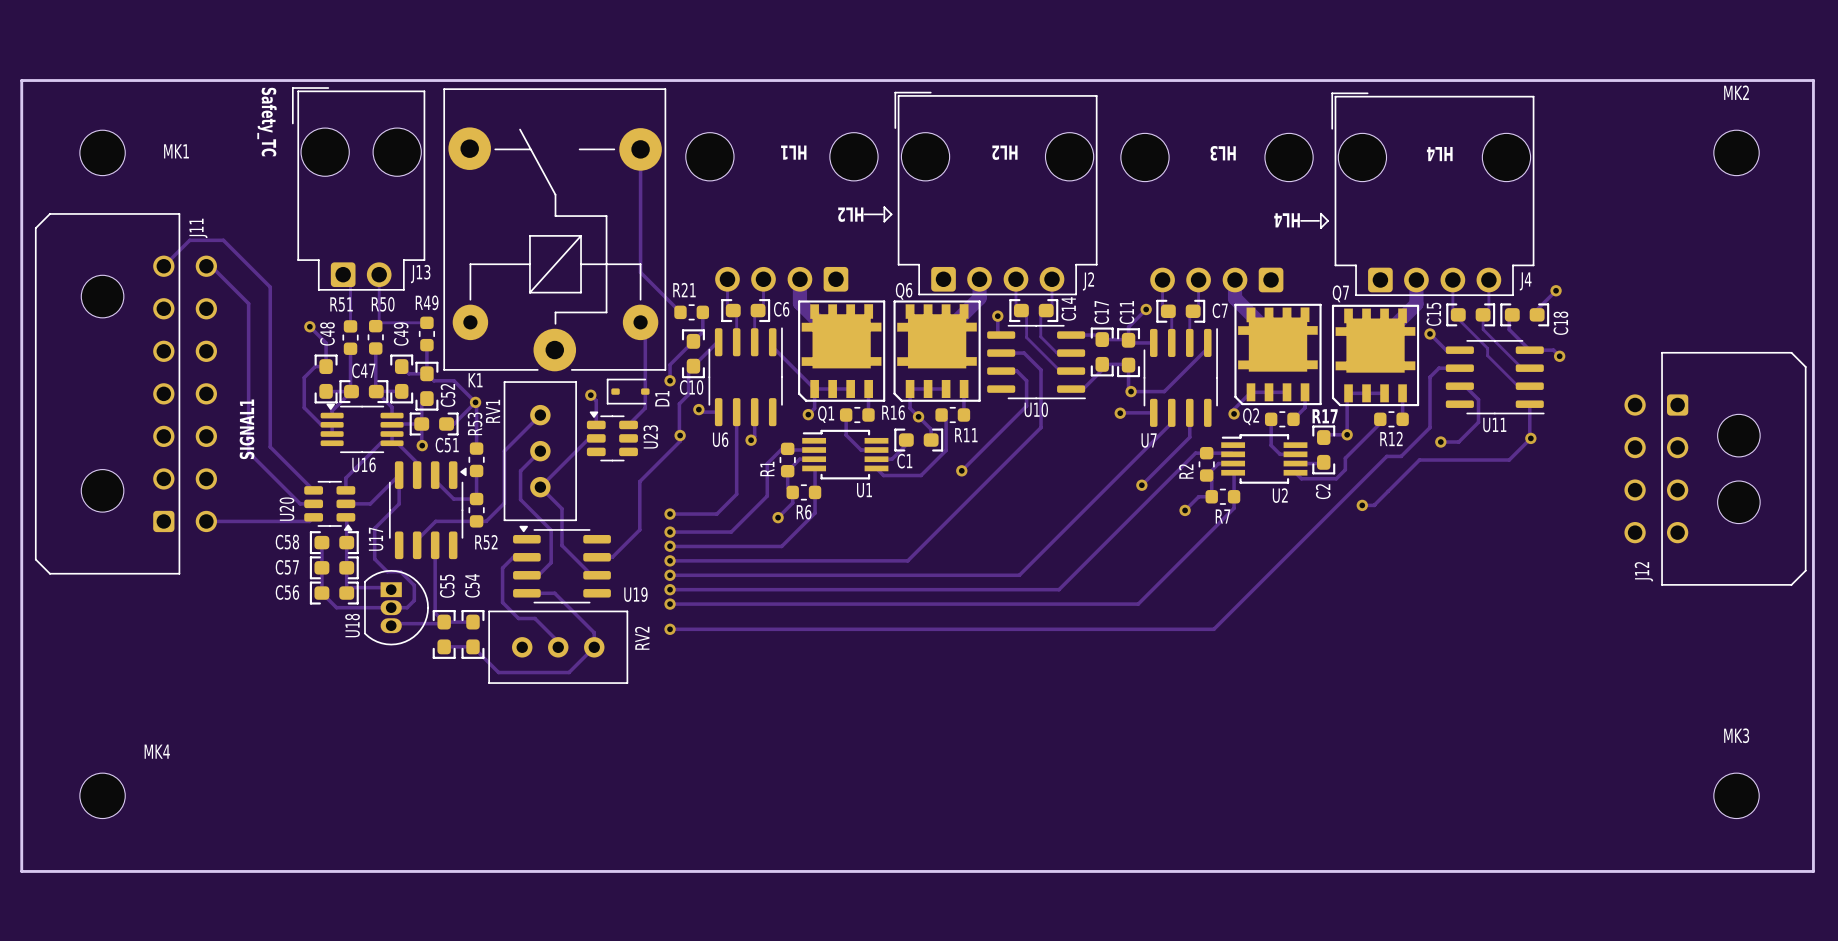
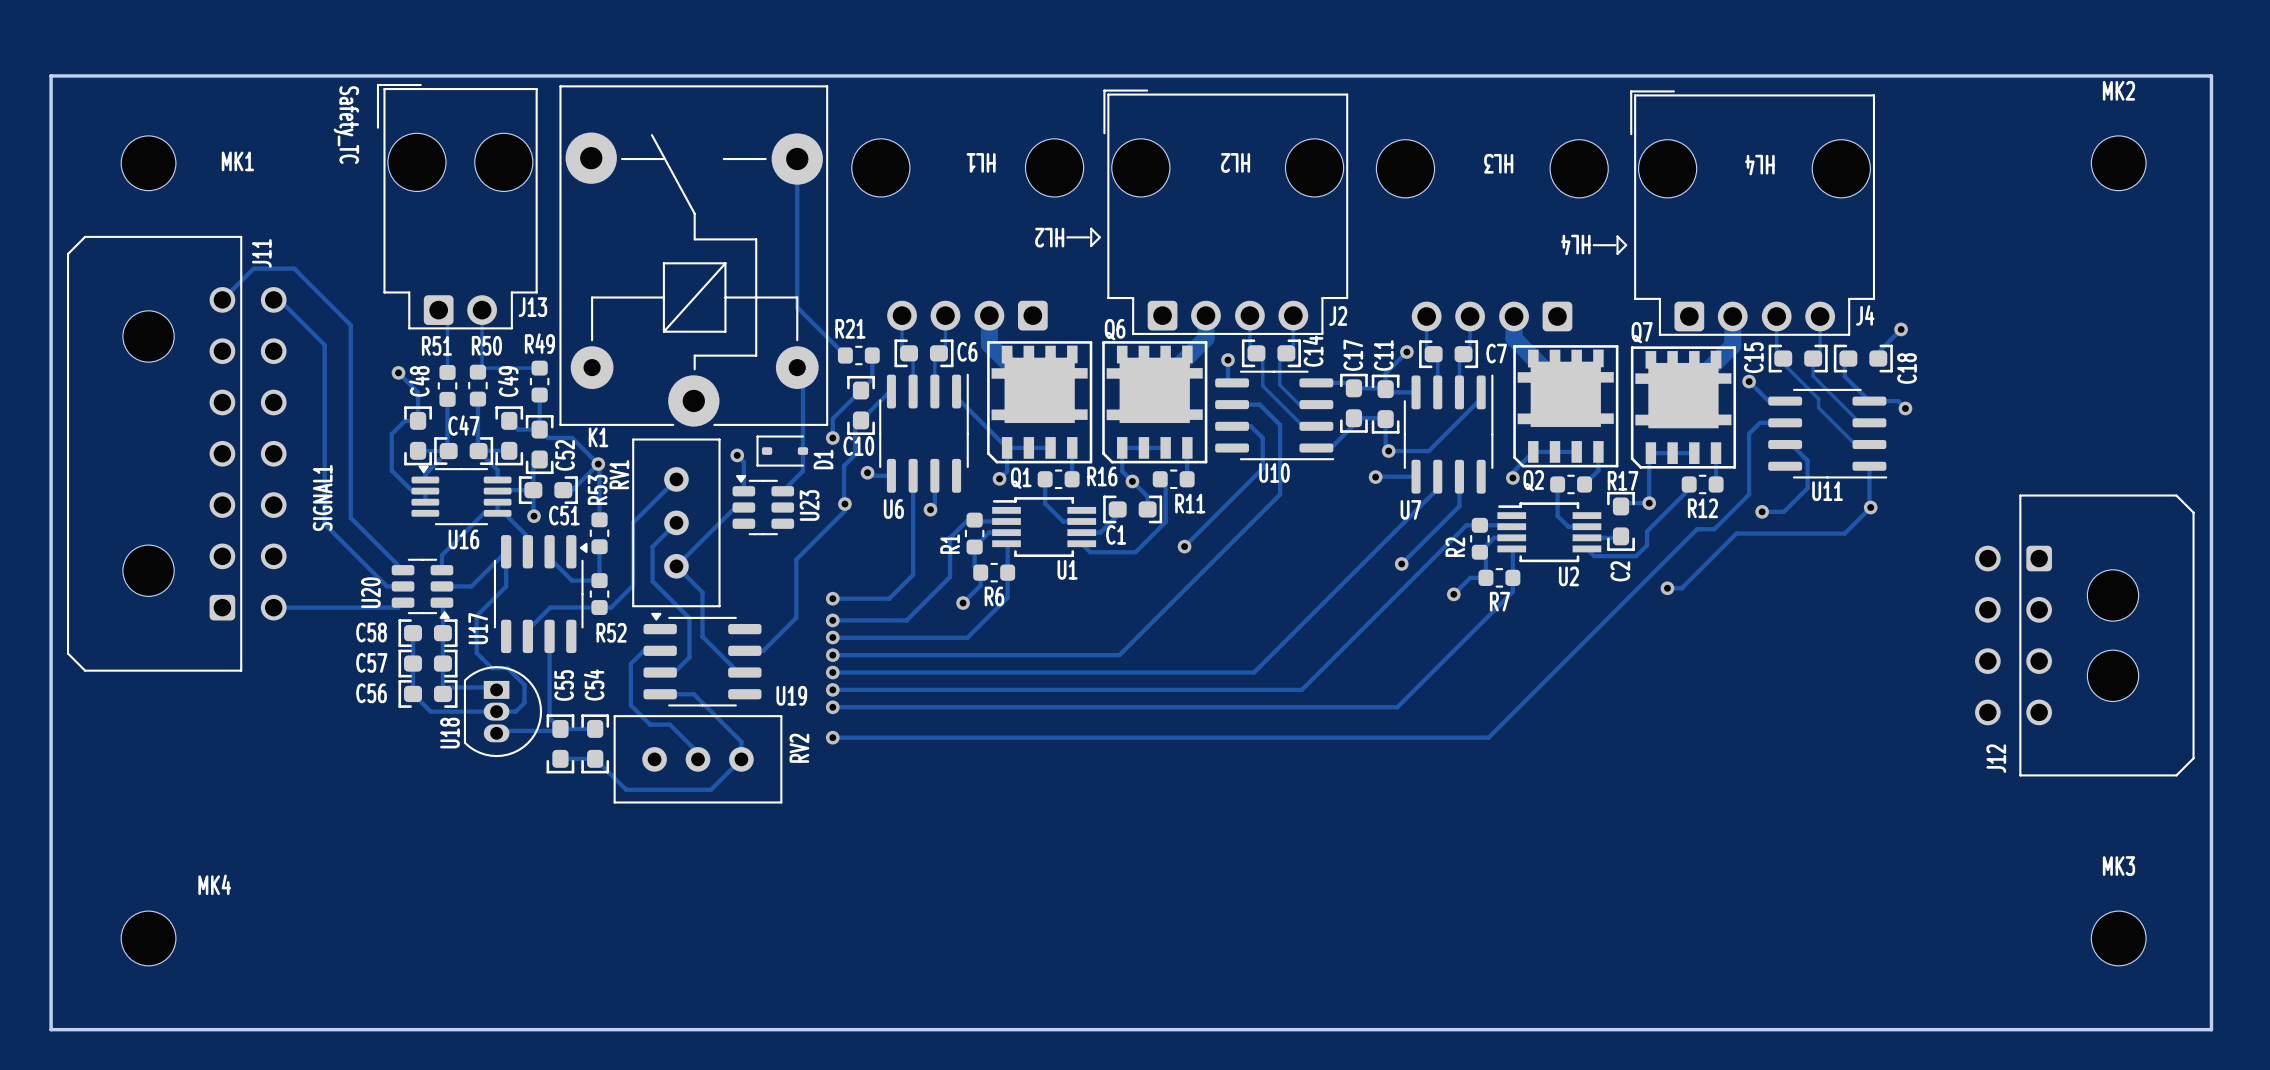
J12 position: (1715, 468) -> (2084, 635)

